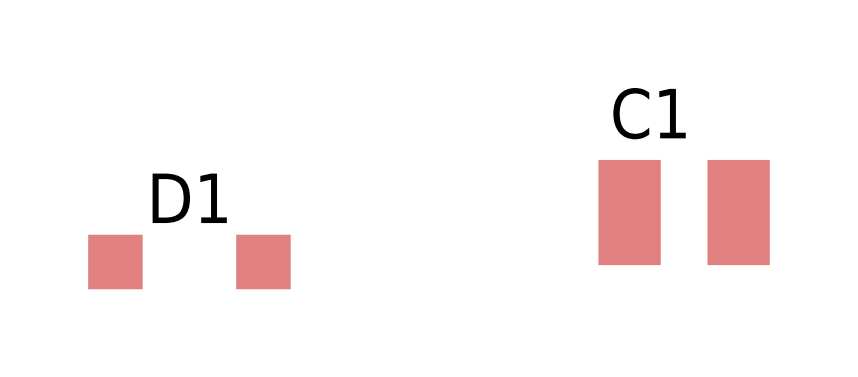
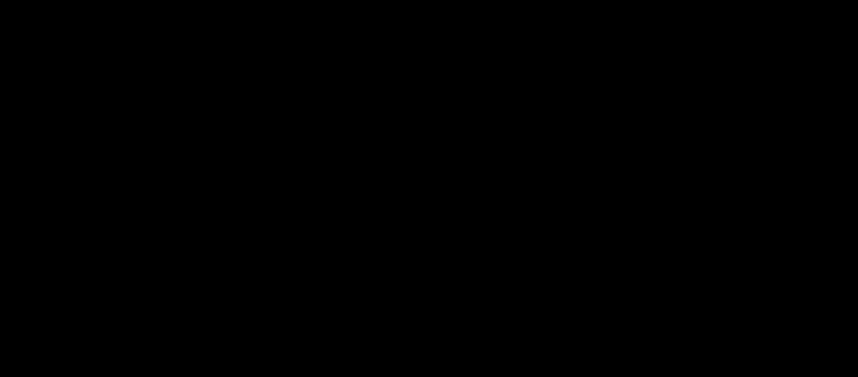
C1: (684, 212) -> none
D1: (189, 261) -> none

